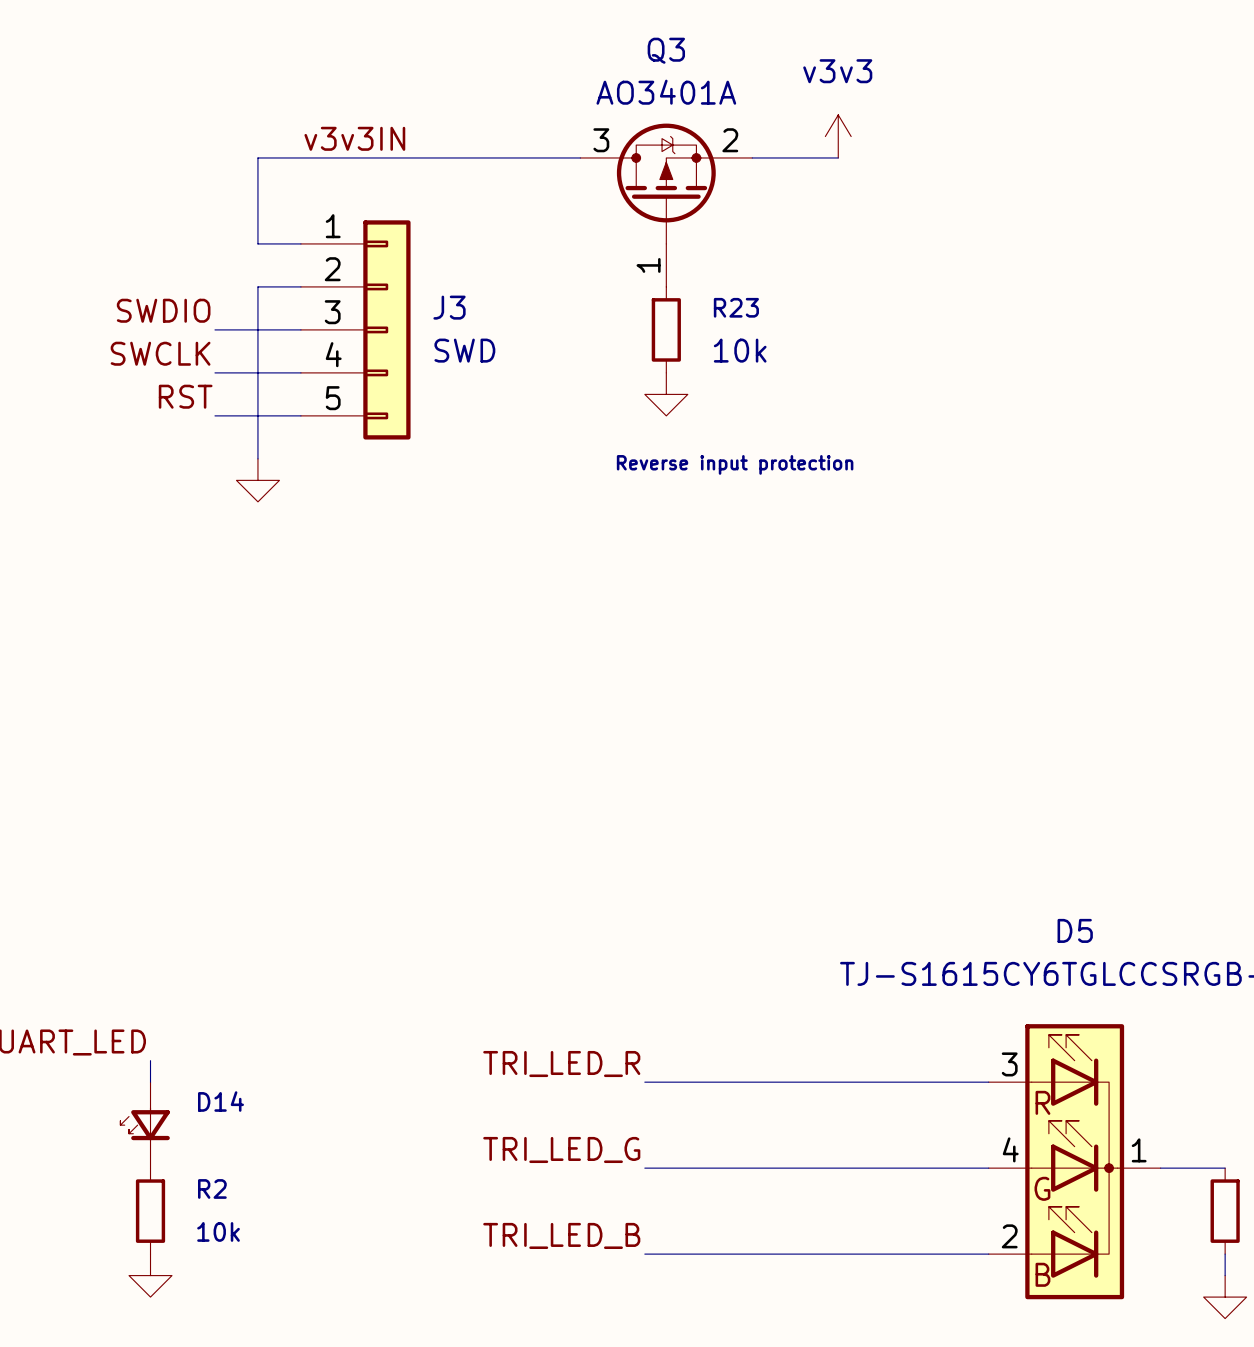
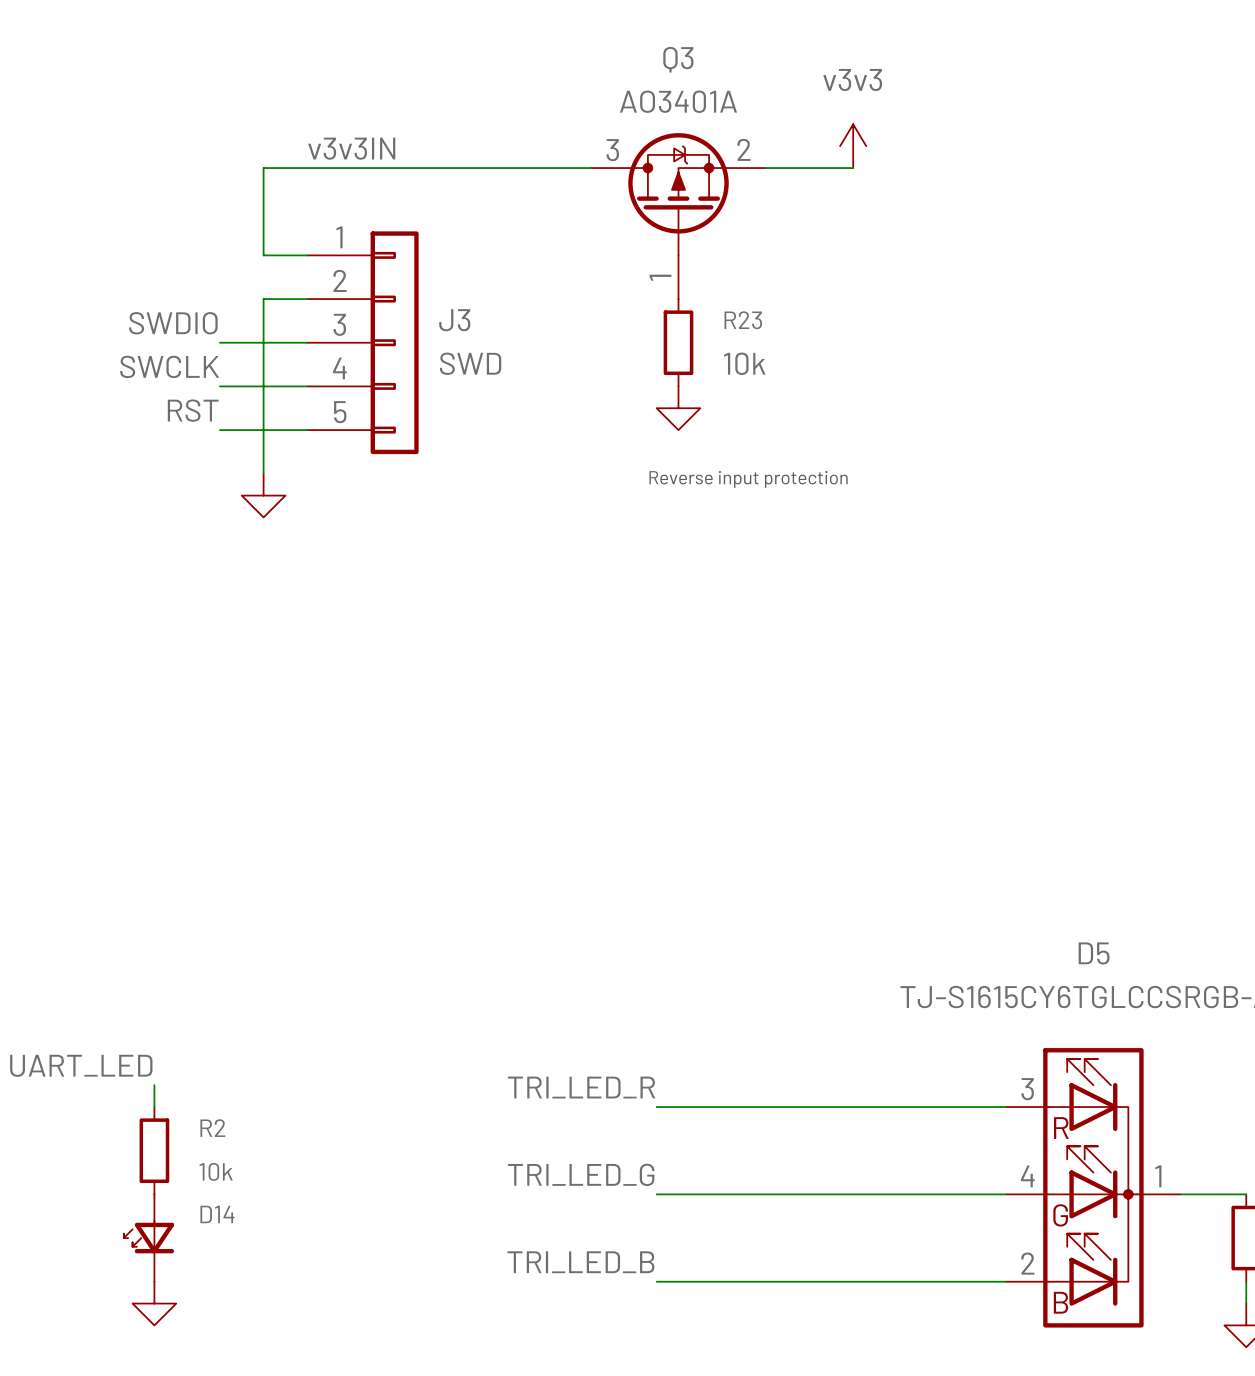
D14 position: (145, 1125) -> (148, 1238)
R2 position: (150, 1211) -> (154, 1150)

